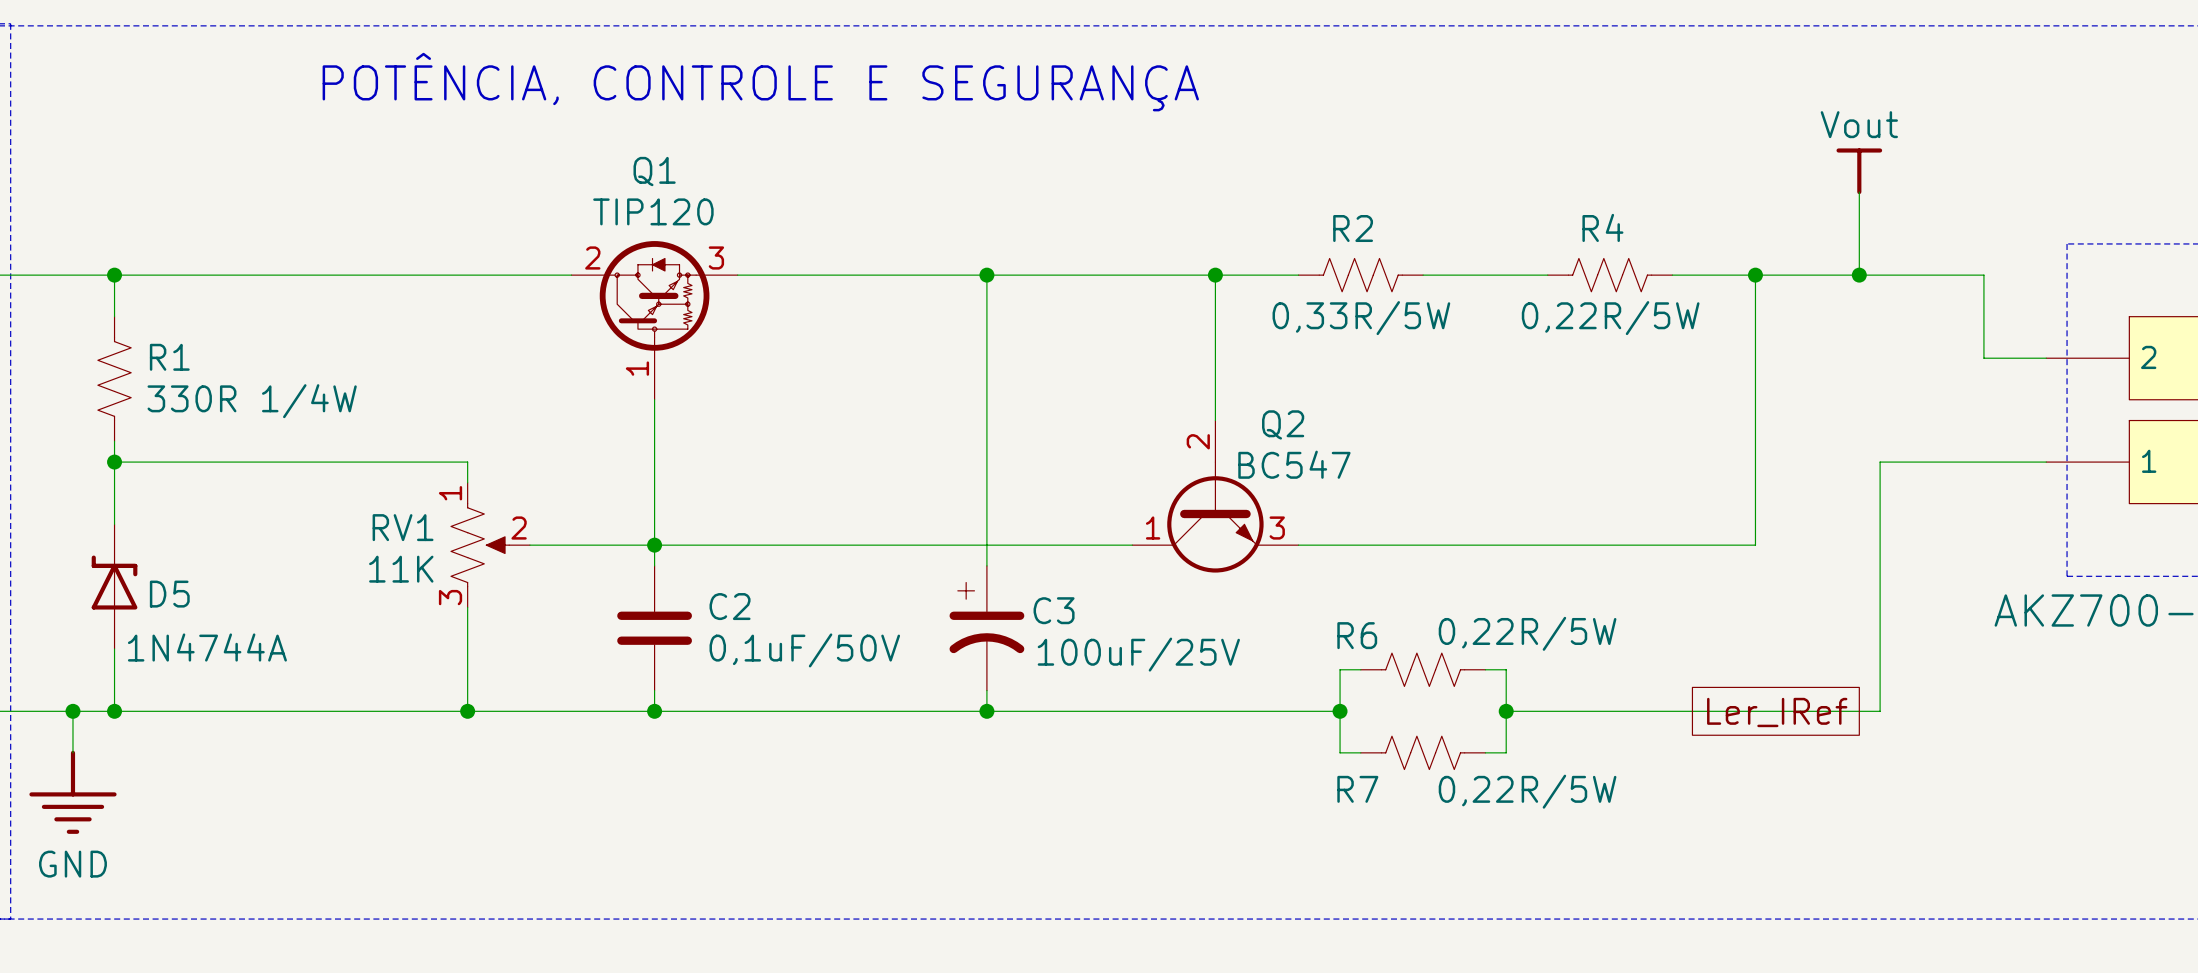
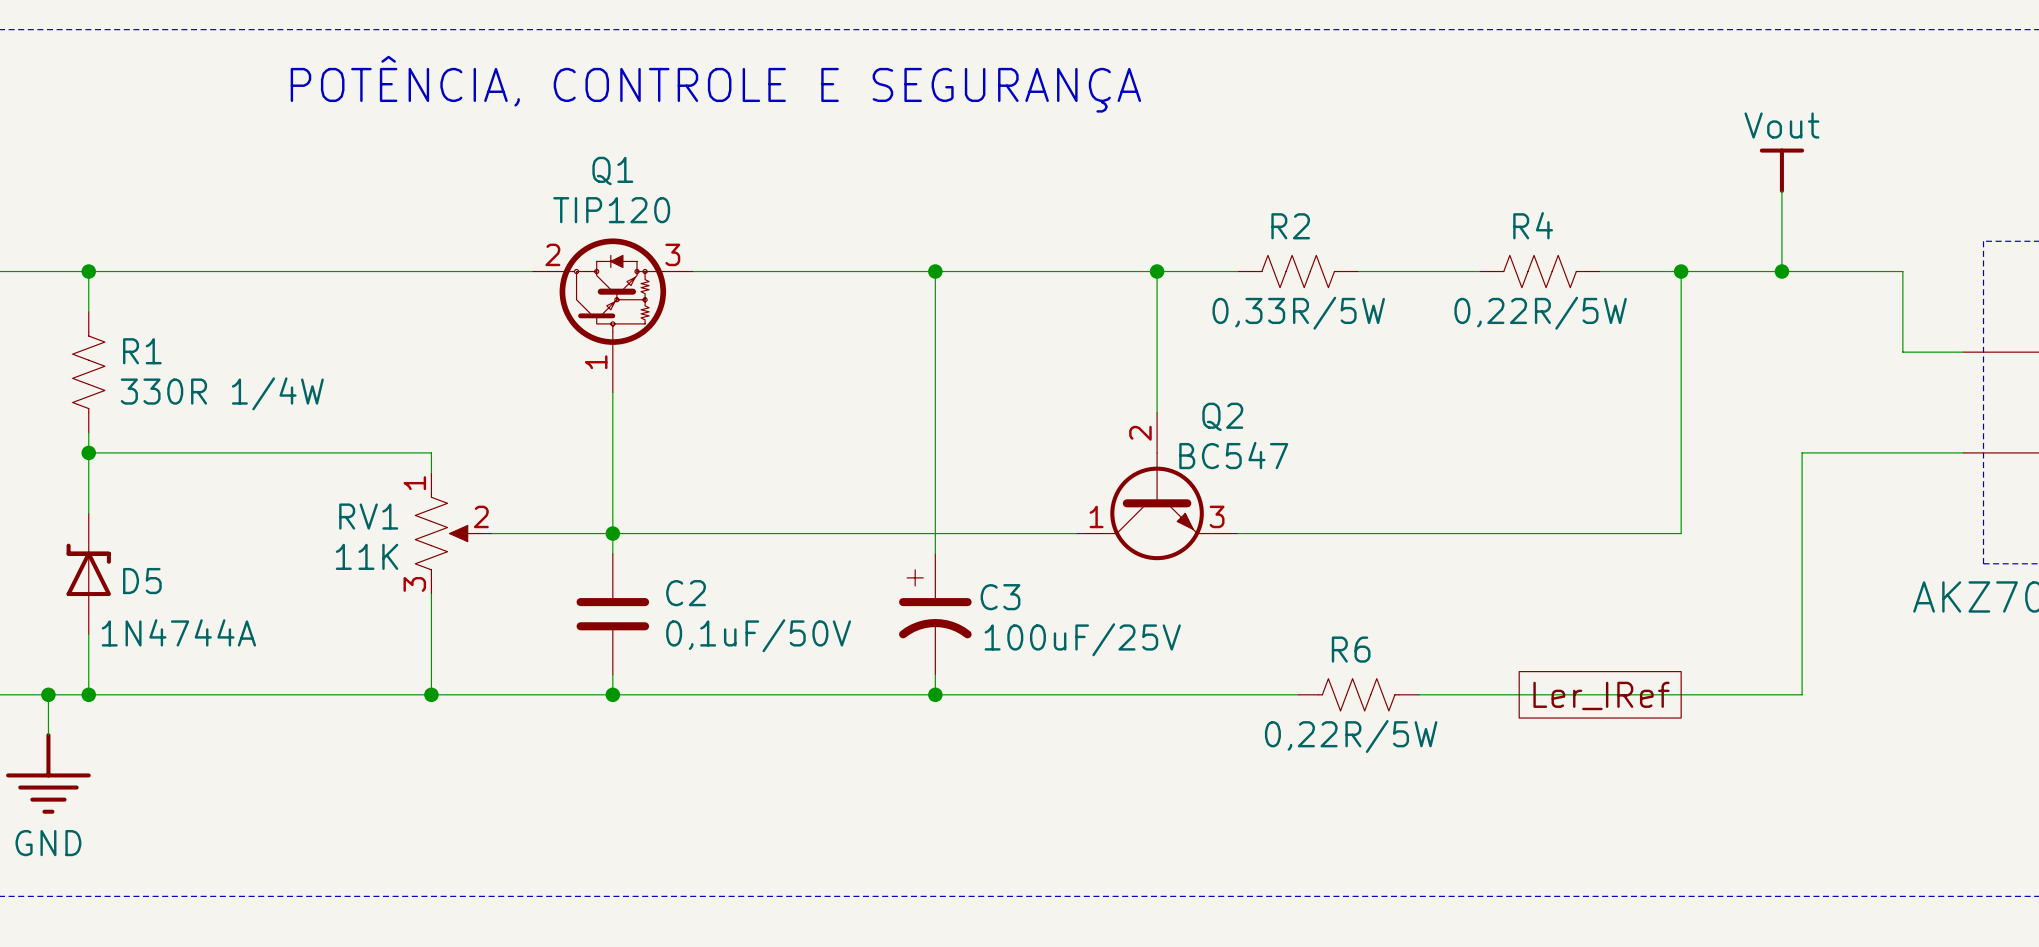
R6 value position: 0,22R/5W (1527, 633) -> 0,22R/5W (1351, 736)
R6 name position: R6 (1357, 635) -> R6 (1351, 649)
wire: (1360, 669) (1340, 669) (1340, 752) (1360, 752) -> none
R6 position: (1423, 669) -> (1358, 694)
wire: (1485, 669) (1506, 669) (1506, 752) (1485, 752) -> none
wire: none -> (1278, 694) (1298, 694)
junction: (1340, 711) -> none
wire: none -> (1419, 694) (1439, 694)
junction: (1506, 711) -> none
global label position: Ler_IRef (1777, 712) -> Ler_IRef (1601, 695)
R7: 0,22R/5W (1423, 752) -> none

